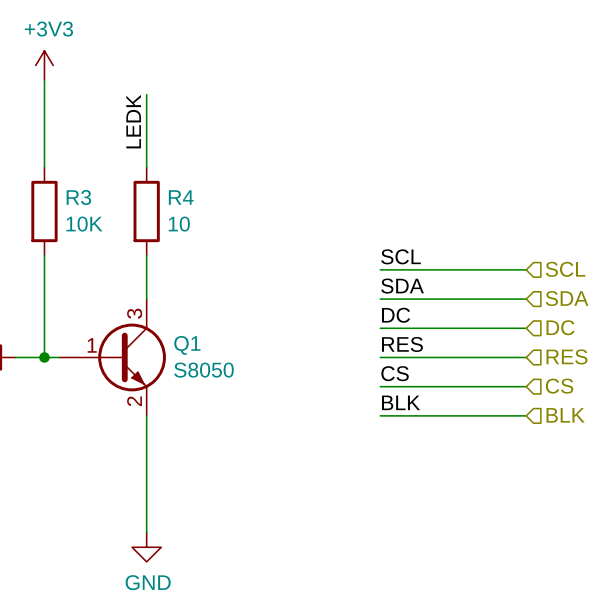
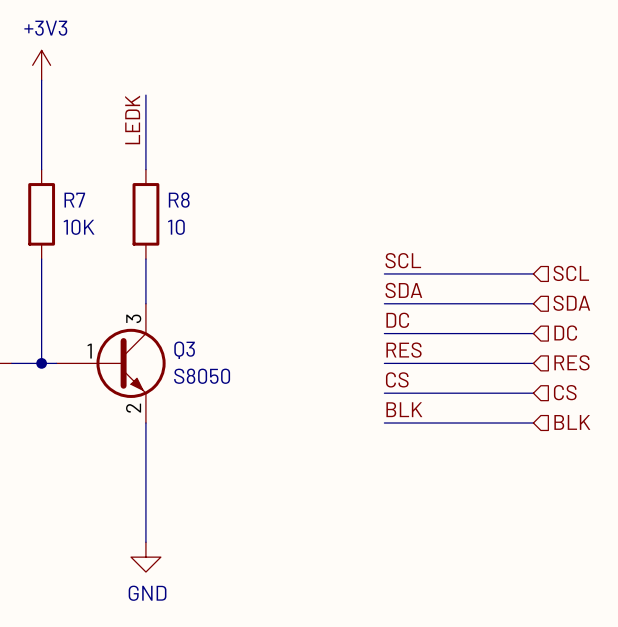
R3 name: R3 (78, 197) -> R7 (74, 200)
R4 name: R4 (181, 197) -> R8 (179, 200)
Q1 name: Q1 (187, 345) -> Q3 (184, 350)

